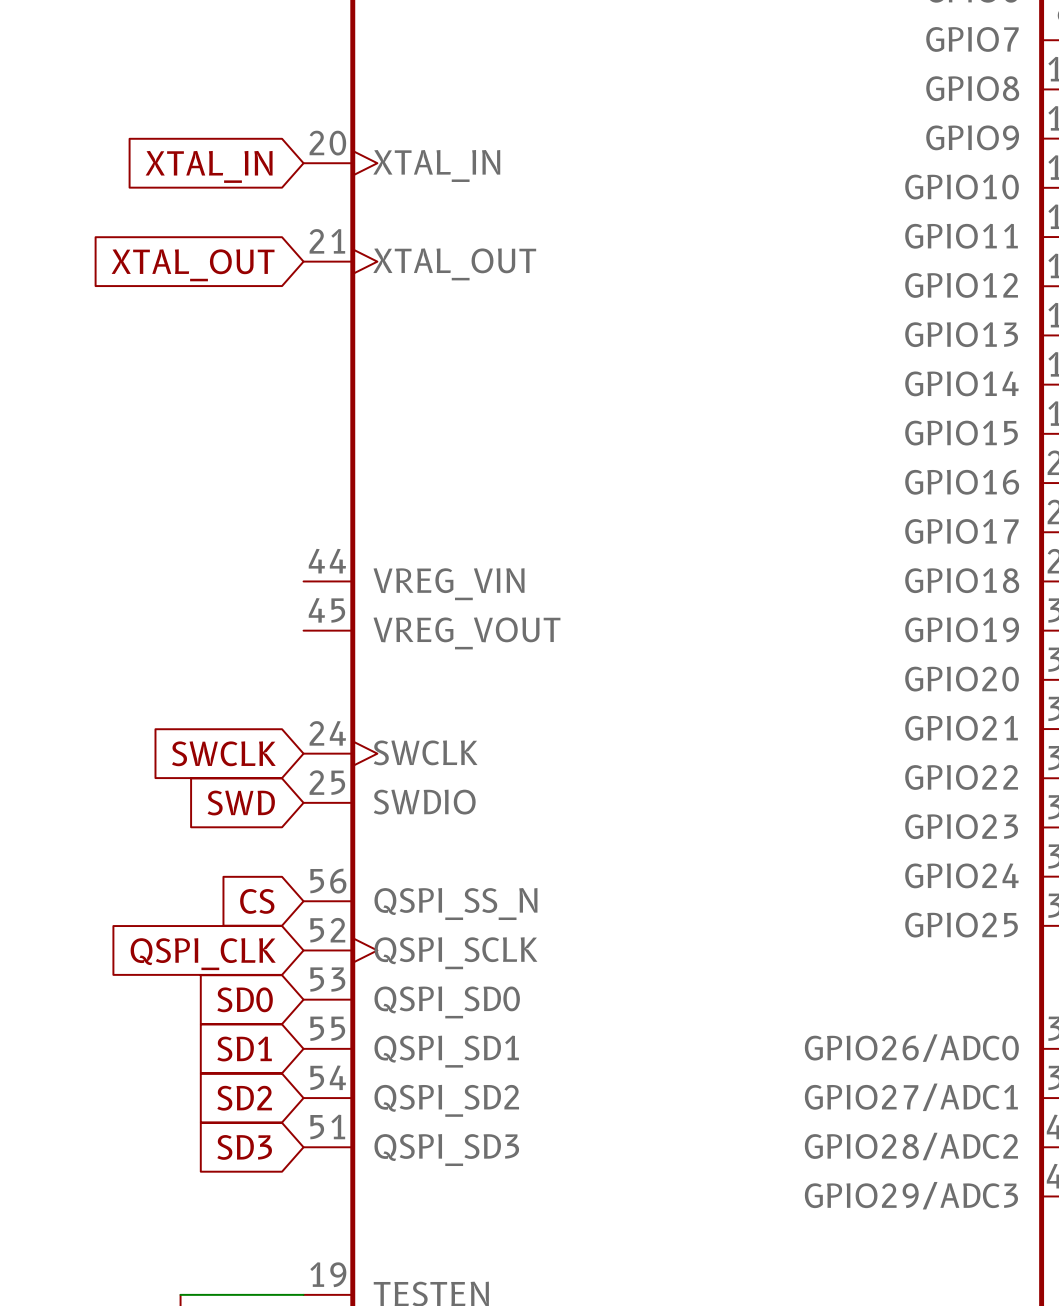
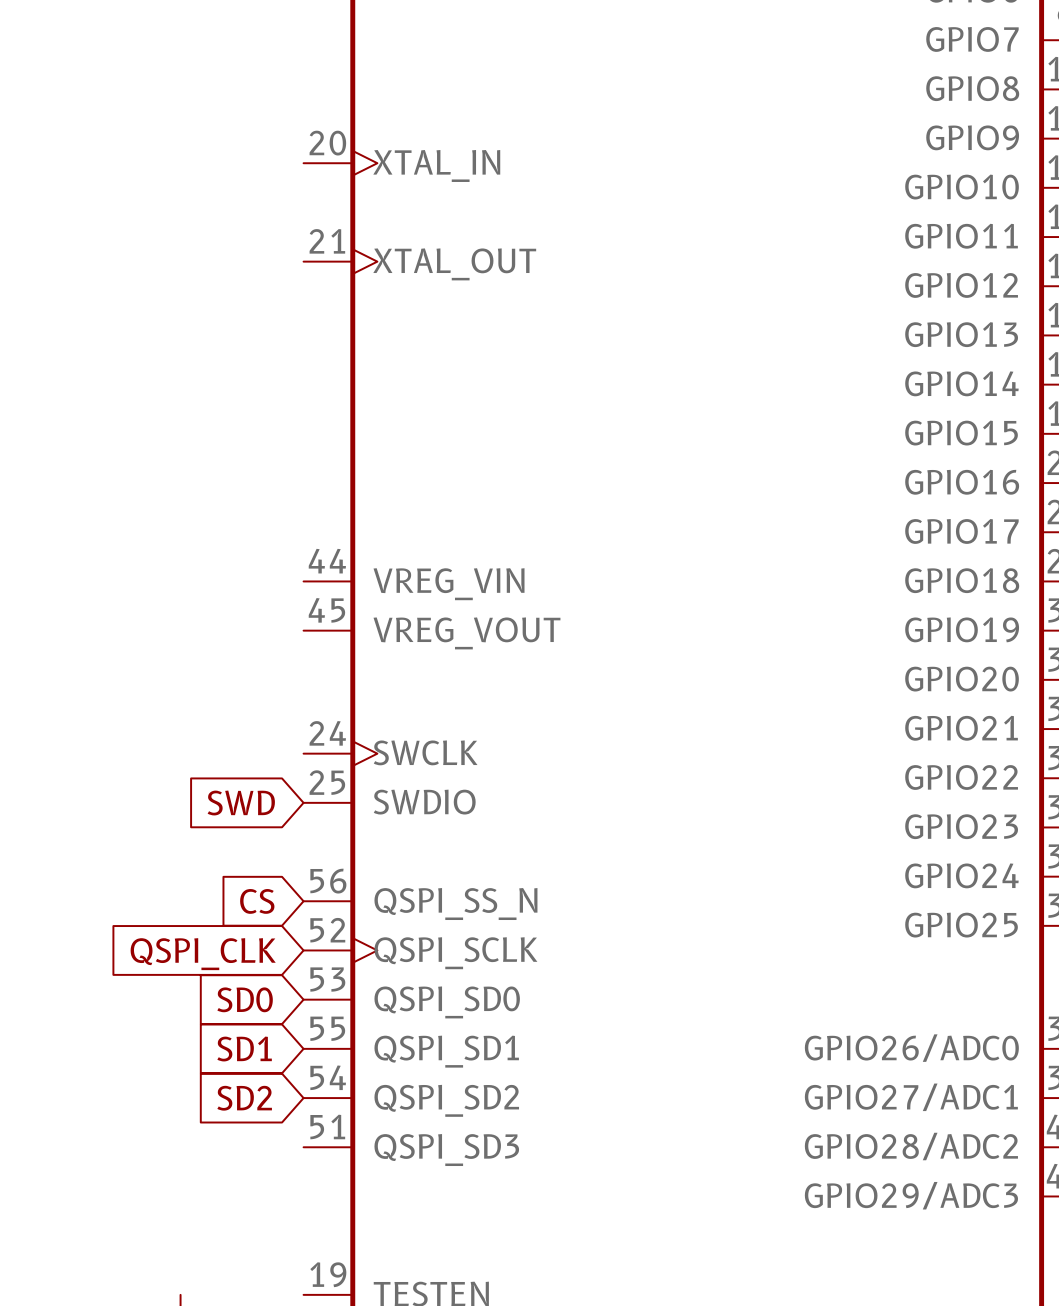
global label: XTAL_IN (209, 166) -> none
global label: XTAL_OUT (193, 265) -> none
global label: SWCLK (223, 753) -> none
global label: SD3 (244, 1147) -> none
wire: (180, 1294) (303, 1294) -> none

